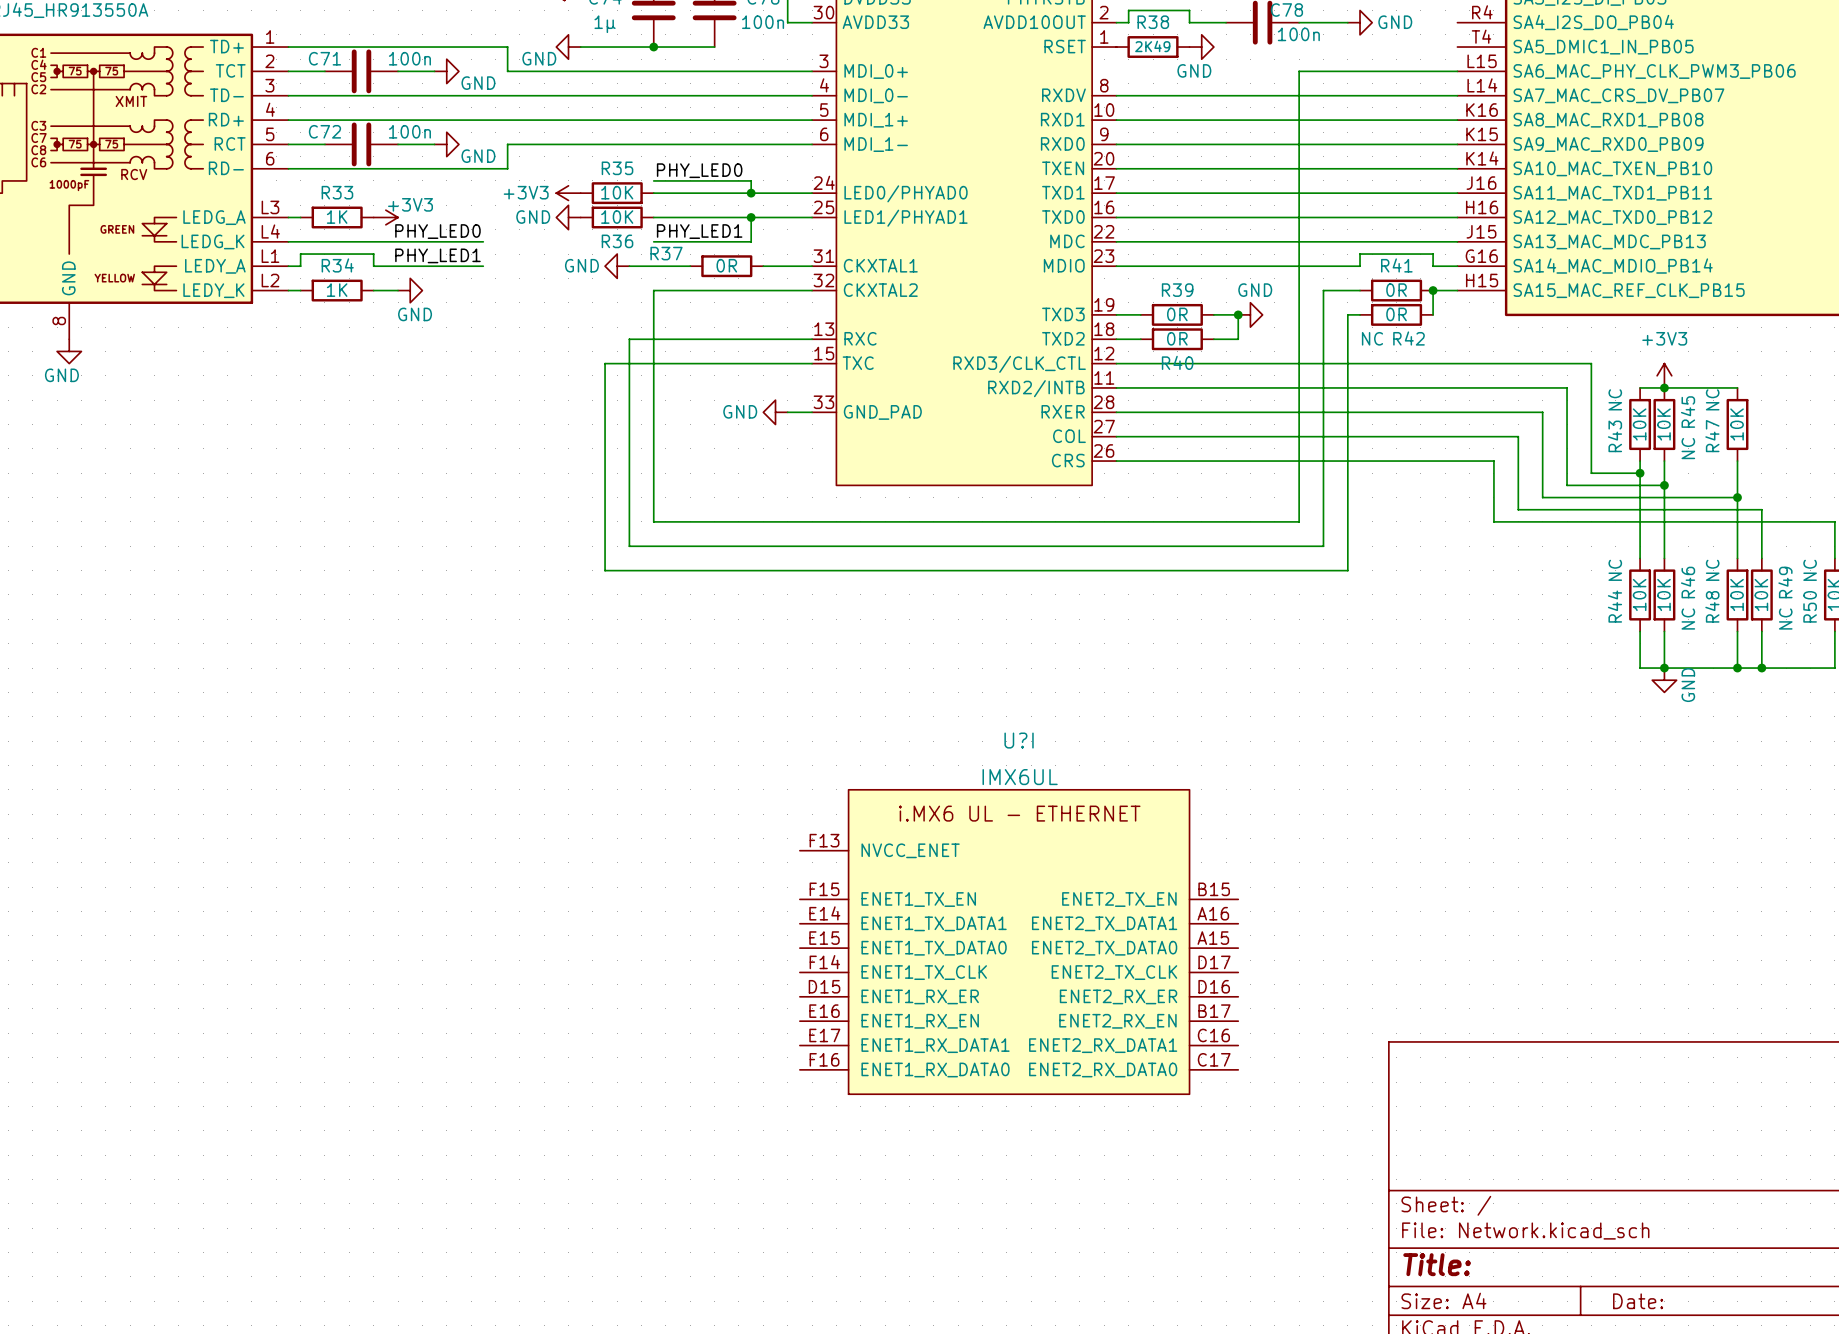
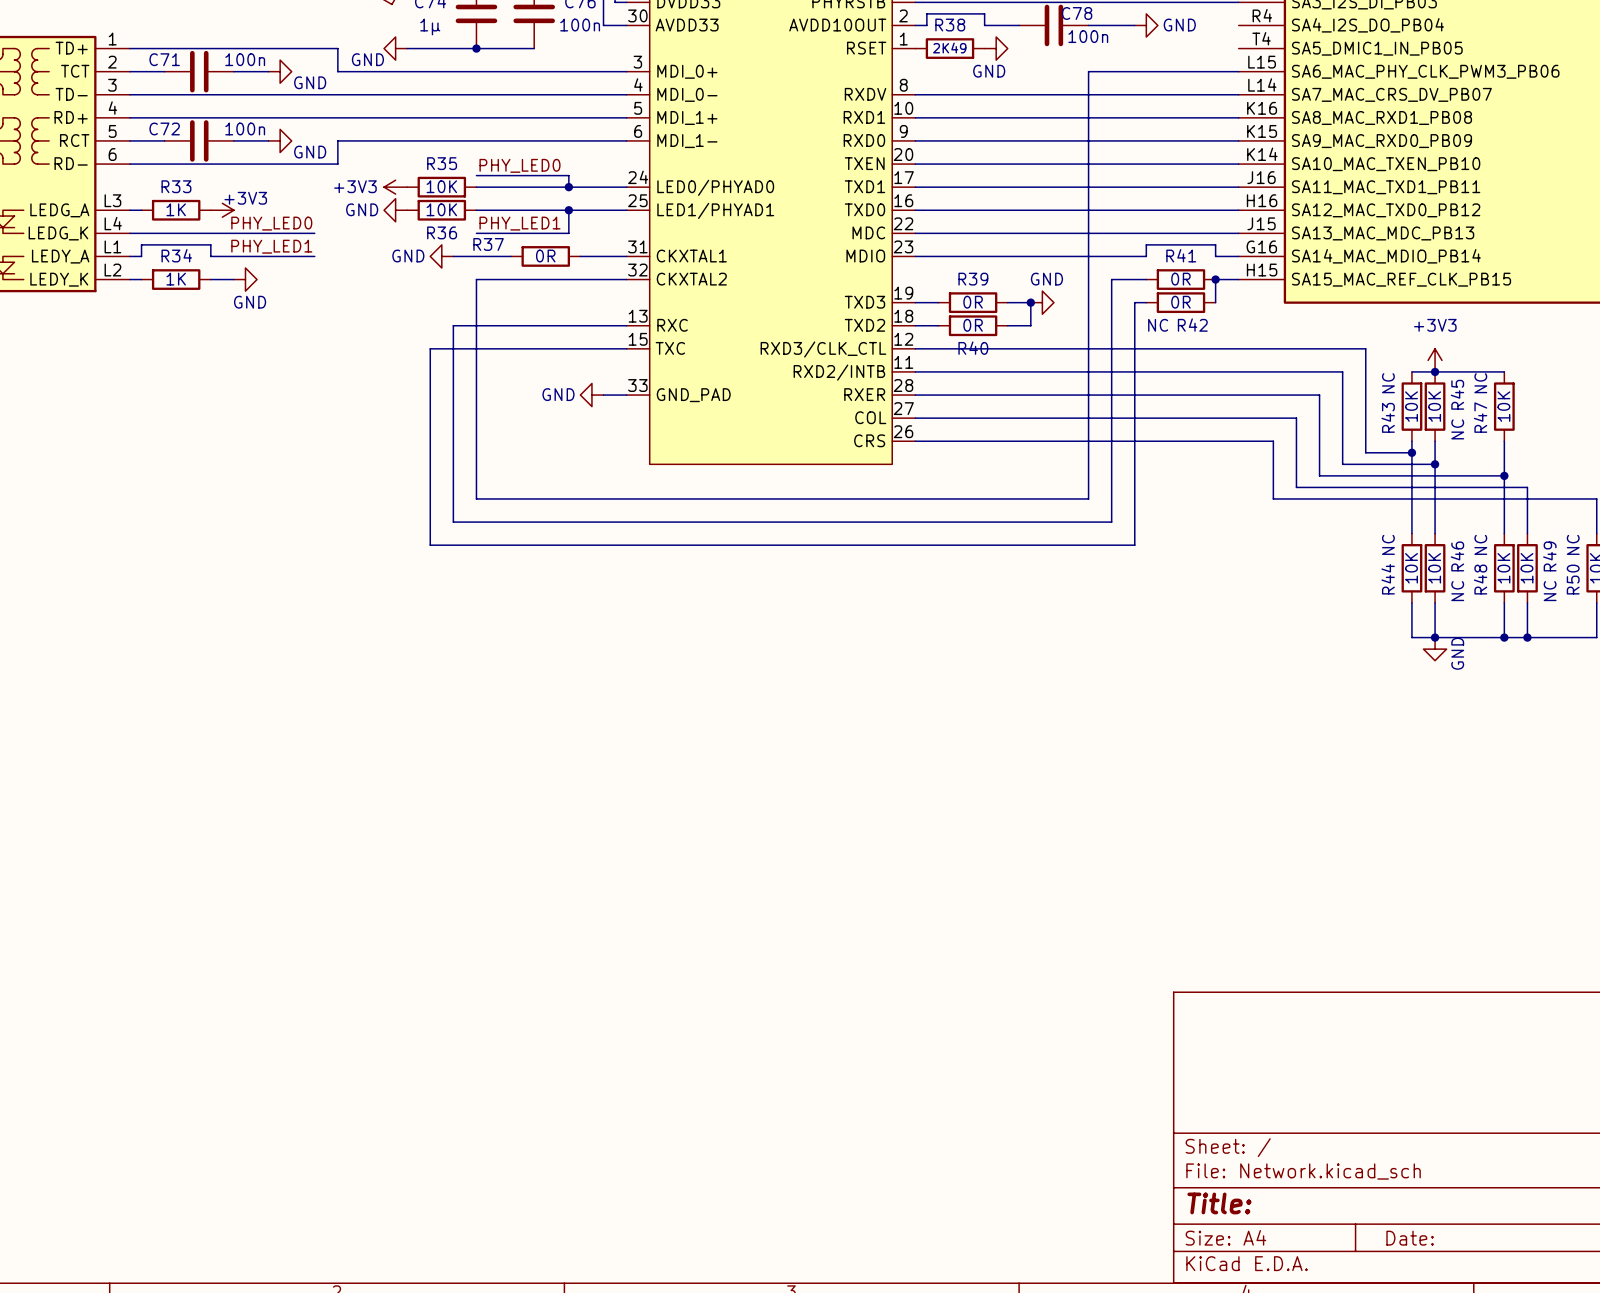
U?I: IMX6UL (1019, 942) -> none

